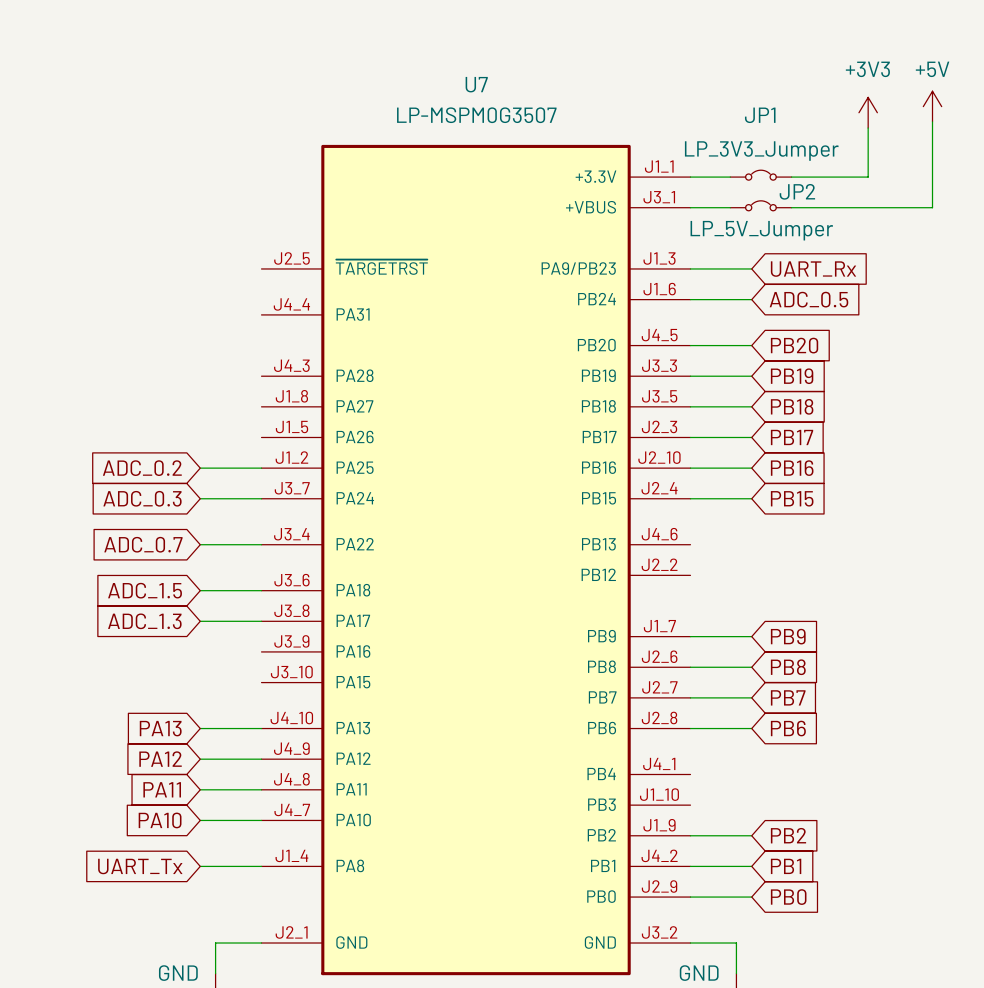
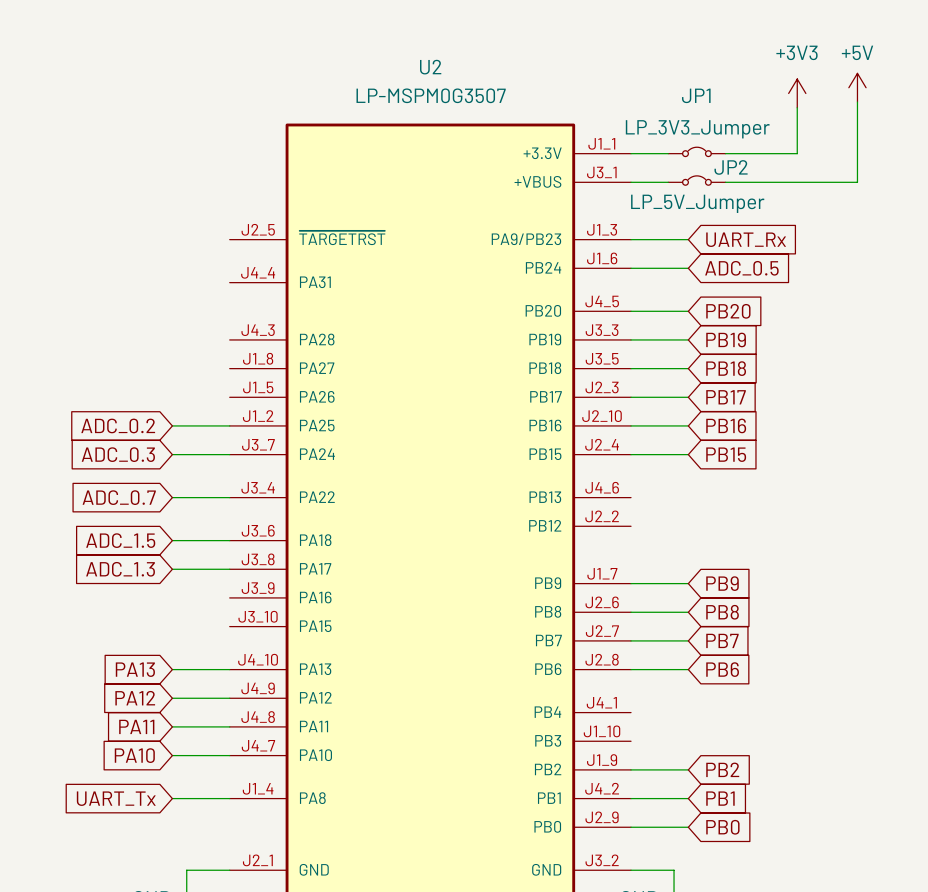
U7 name: U7 (476, 84) -> U2 (430, 67)

